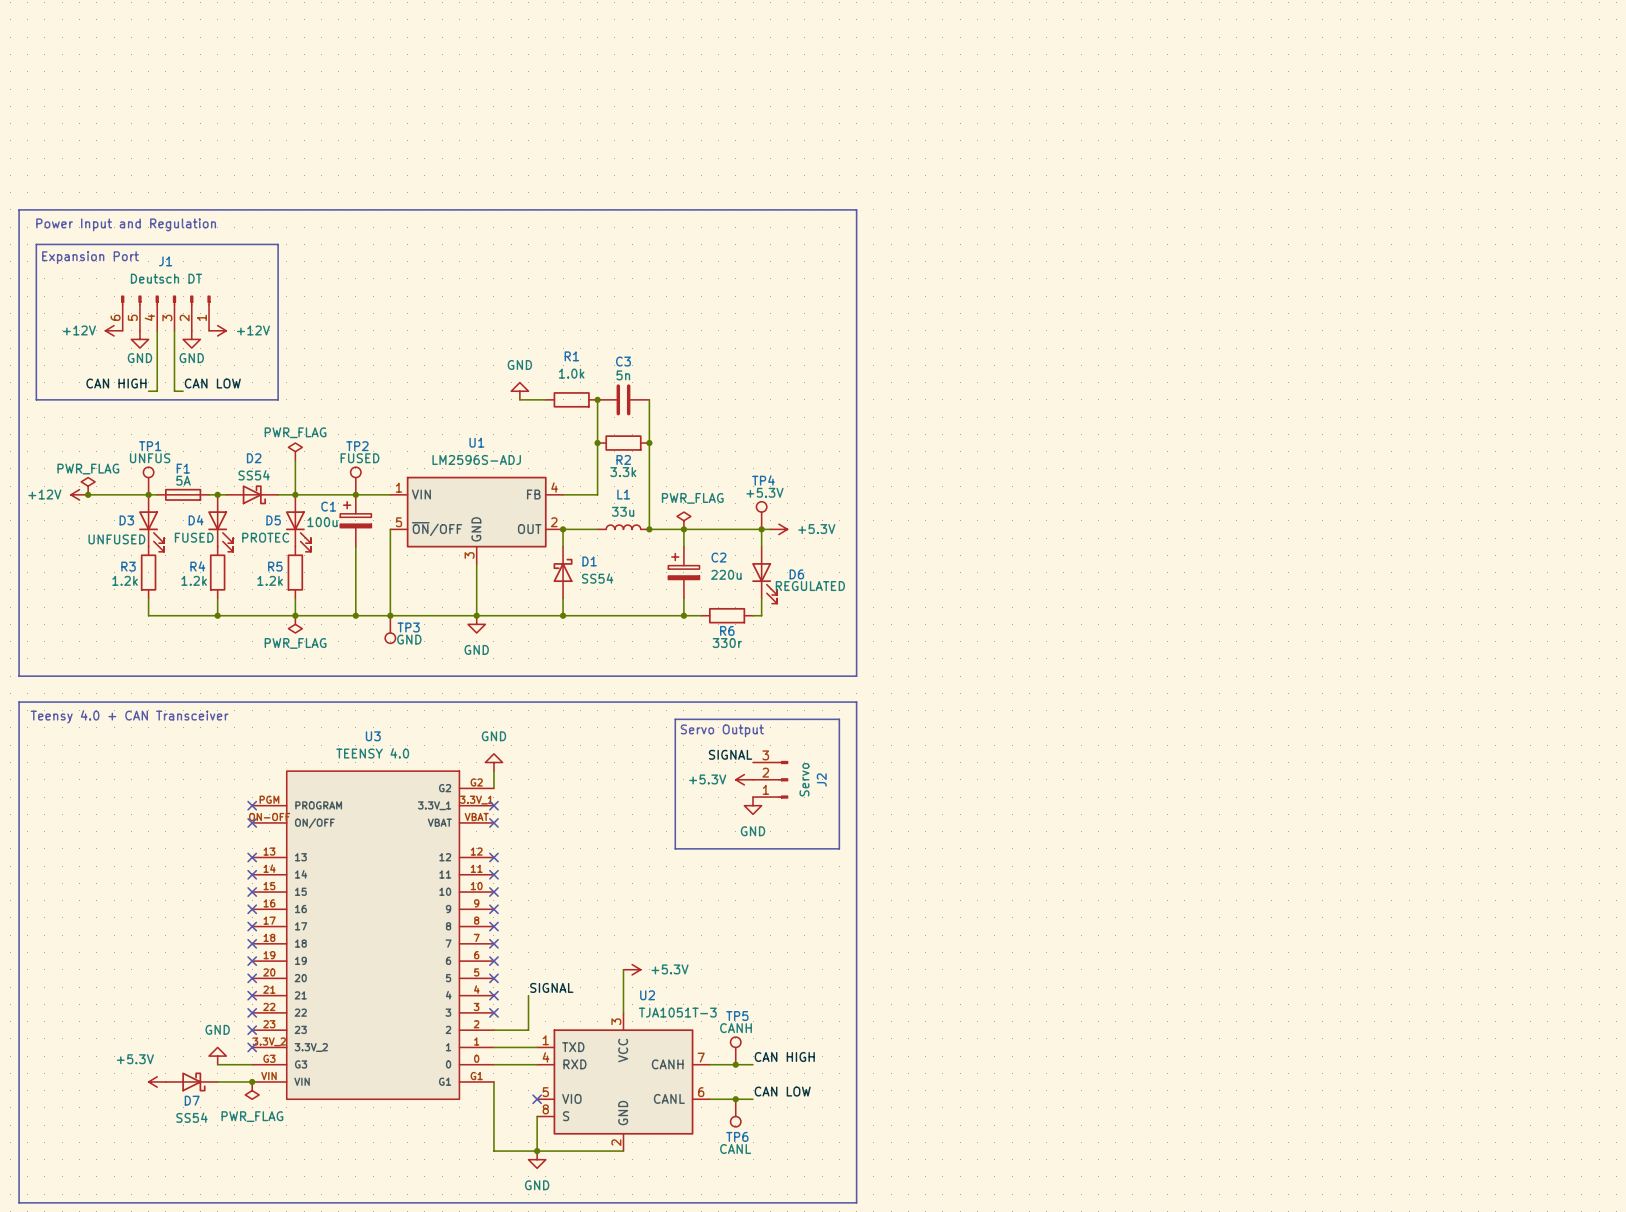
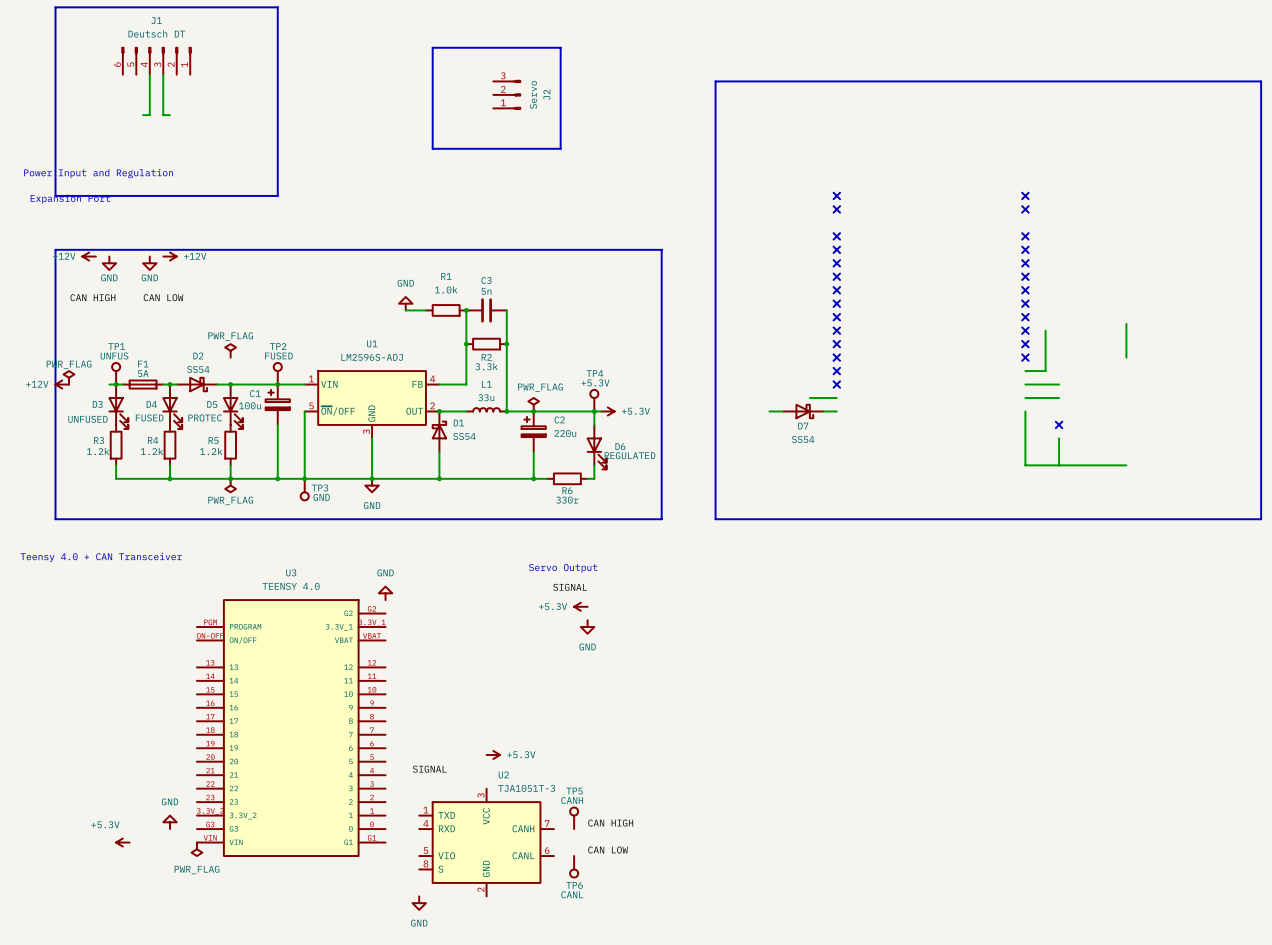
line: none -> (55, 7) (277, 7) (277, 195) (55, 195) (55, 7)
line: none -> (432, 47) (560, 47) (560, 148) (432, 148) (432, 47)
wire: none -> (149, 74) (149, 115) (143, 115)
wire: none -> (163, 74) (163, 115) (170, 115)
line: none -> (715, 81) (1261, 81) (1261, 519) (715, 519) (715, 81)
line: (19, 209) (19, 676) (856, 676) (856, 209) (19, 209) -> (55, 249) (55, 519) (661, 519) (661, 249) (55, 249)
line: (36, 244) (278, 244) (278, 399) (36, 399) (36, 244) -> none
no-connect mark: none -> (836, 195)
no-connect mark: none -> (1025, 195)
no-connect mark: none -> (836, 209)
no-connect mark: none -> (1025, 209)
no-connect mark: none -> (836, 236)
no-connect mark: none -> (1025, 236)
J1 position: (165, 313) -> (156, 61)
no-connect mark: none -> (836, 249)
no-connect mark: none -> (1025, 249)
wire: (157, 330) (157, 391) (148, 391) -> none
wire: (174, 330) (174, 391) (183, 391) -> none
no-connect mark: none -> (836, 263)
no-connect mark: none -> (1025, 263)
no-connect mark: none -> (836, 276)
no-connect mark: none -> (1025, 276)
no-connect mark: none -> (836, 290)
no-connect mark: none -> (1025, 290)
no-connect mark: none -> (836, 303)
no-connect mark: none -> (1025, 303)
no-connect mark: none -> (836, 317)
no-connect mark: none -> (1025, 317)
wire: none -> (1126, 323) (1126, 357)
no-connect mark: none -> (836, 330)
no-connect mark: none -> (1025, 330)
wire: none -> (1045, 330) (1045, 371) (1025, 371)
no-connect mark: none -> (836, 344)
no-connect mark: none -> (1025, 344)
wire: (295, 460) (295, 494) -> none
no-connect mark: none -> (836, 357)
no-connect mark: none -> (1025, 357)
no-connect mark: none -> (836, 371)
wire: (88, 494) (139, 494) -> none
junction: (88, 494) -> none
no-connect mark: none -> (836, 384)
wire: none -> (1025, 384) (1059, 384)
wire: none -> (809, 398) (836, 398)
wire: none -> (1025, 398) (1059, 398)
wire: none -> (769, 411) (782, 411)
wire: none -> (823, 411) (836, 411)
wire: none -> (1025, 411) (1025, 465) (1126, 465)
no-connect mark: none -> (1059, 424)
wire: none -> (1059, 438) (1059, 465)
D1 position: (563, 572) -> (439, 431)
C2 position: (683, 572) -> (533, 431)
line: (19, 702) (856, 702) (856, 1202) (19, 1202) (19, 702) -> none
line: (675, 719) (839, 719) (839, 848) (675, 848) (675, 719) -> none
wire: (493, 771) (493, 788) -> none
J2 position: (770, 779) -> (506, 94)
no-connect mark: (252, 805) -> none
no-connect mark: (493, 805) -> none
no-connect mark: (252, 822) -> none
no-connect mark: (493, 822) -> none
no-connect mark: (252, 857) -> none
no-connect mark: (493, 857) -> none
no-connect mark: (252, 874) -> none
no-connect mark: (493, 874) -> none
no-connect mark: (252, 892) -> none
no-connect mark: (493, 892) -> none
no-connect mark: (252, 909) -> none
no-connect mark: (493, 909) -> none
no-connect mark: (252, 926) -> none
no-connect mark: (493, 926) -> none
no-connect mark: (252, 943) -> none
no-connect mark: (493, 943) -> none
no-connect mark: (252, 961) -> none
no-connect mark: (493, 961) -> none
wire: (623, 969) (623, 1012) -> none
no-connect mark: (252, 978) -> none
no-connect mark: (493, 978) -> none
no-connect mark: (252, 995) -> none
no-connect mark: (493, 995) -> none
wire: (528, 995) (528, 1030) (493, 1030) -> none
no-connect mark: (252, 1012) -> none
no-connect mark: (493, 1012) -> none
no-connect mark: (252, 1030) -> none
no-connect mark: (252, 1047) -> none
wire: (493, 1047) (537, 1047) -> none
wire: (217, 1064) (252, 1064) -> none
wire: (493, 1064) (537, 1064) -> none
wire: (709, 1064) (753, 1064) -> none
junction: (735, 1064) -> none
D7 position: (191, 1081) -> (803, 411)
wire: (217, 1081) (252, 1081) -> none
junction: (252, 1081) -> none
wire: (493, 1081) (493, 1151) (623, 1151) -> none
no-connect mark: (537, 1099) -> none
wire: (709, 1099) (753, 1099) -> none
junction: (735, 1099) -> none
wire: (537, 1116) (537, 1151) -> none
junction: (537, 1151) -> none

